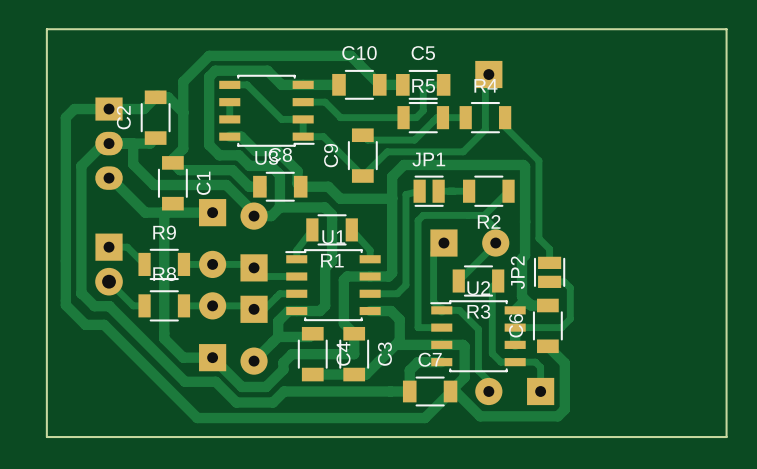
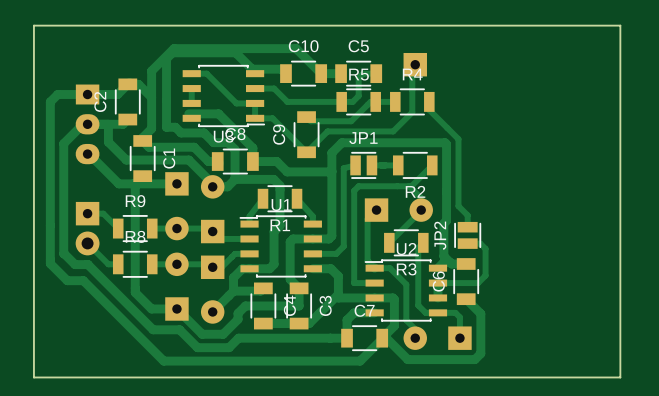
track: (338, 84) (281, 84) (267, 70) (215, 70) (209, 76) (209, 144) (219, 155) (238, 155) (249, 165) (270, 165) (279, 174) -> (285, 73) (281, 69) (252, 69) (235, 52) (172, 52) (166, 58) (166, 127) (175, 127) (181, 132) (204, 132) (213, 142) (228, 142) (235, 151)
track: (229, 136) (241, 136) (255, 151) (277, 151) (297, 171) (297, 183) (300, 186) -> (188, 113) (218, 113) (252, 148) (252, 161)

